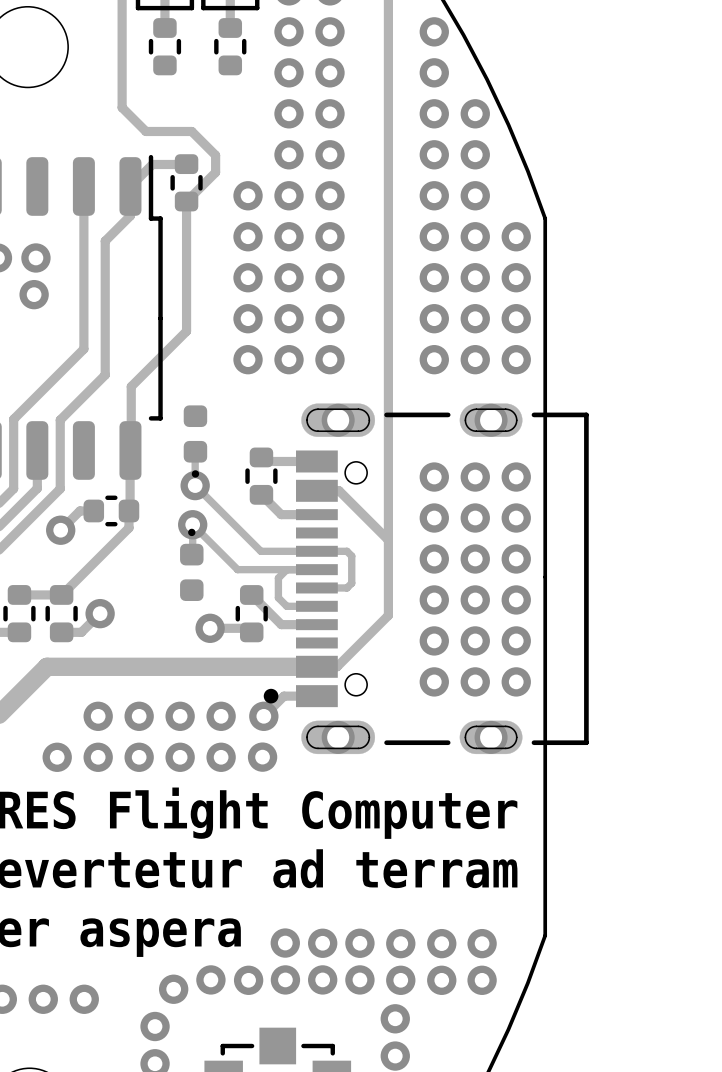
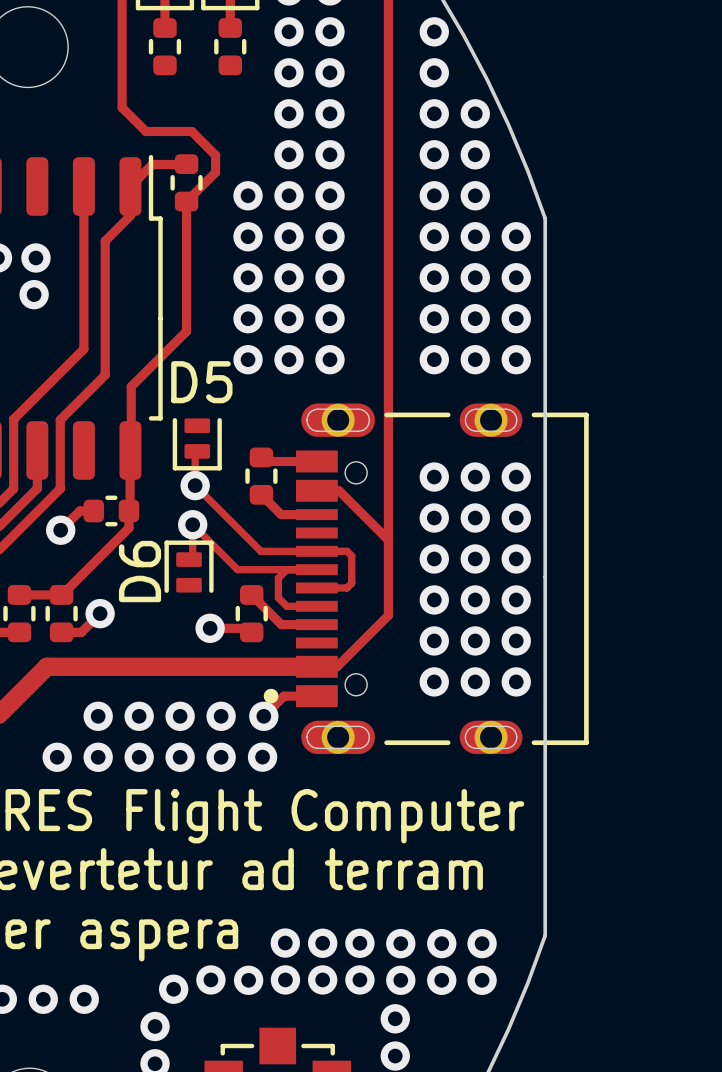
part: (195, 441) -> none
D5: none -> (197, 444)
part: (191, 564) -> none
D6: none -> (189, 566)

